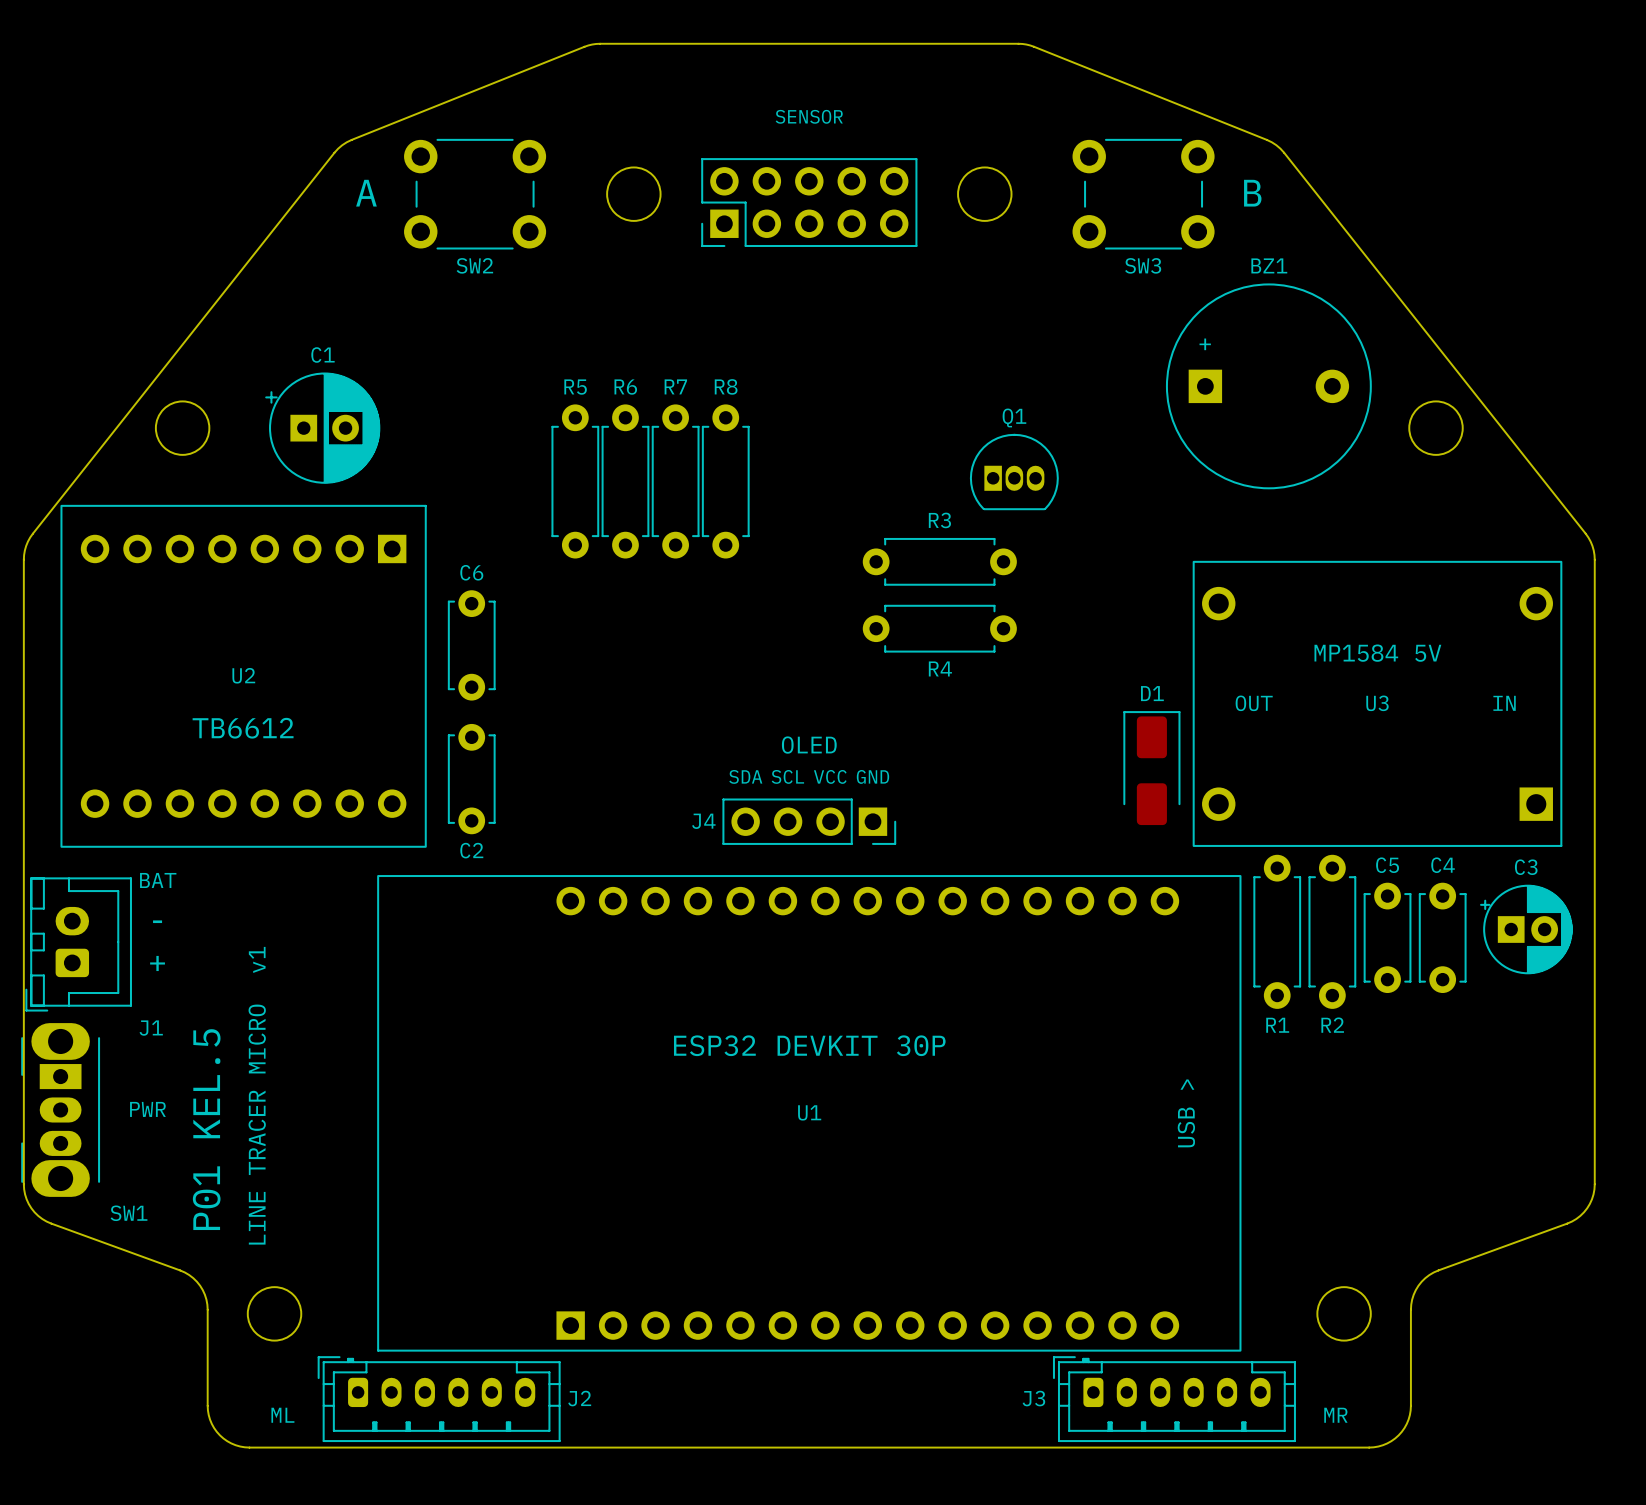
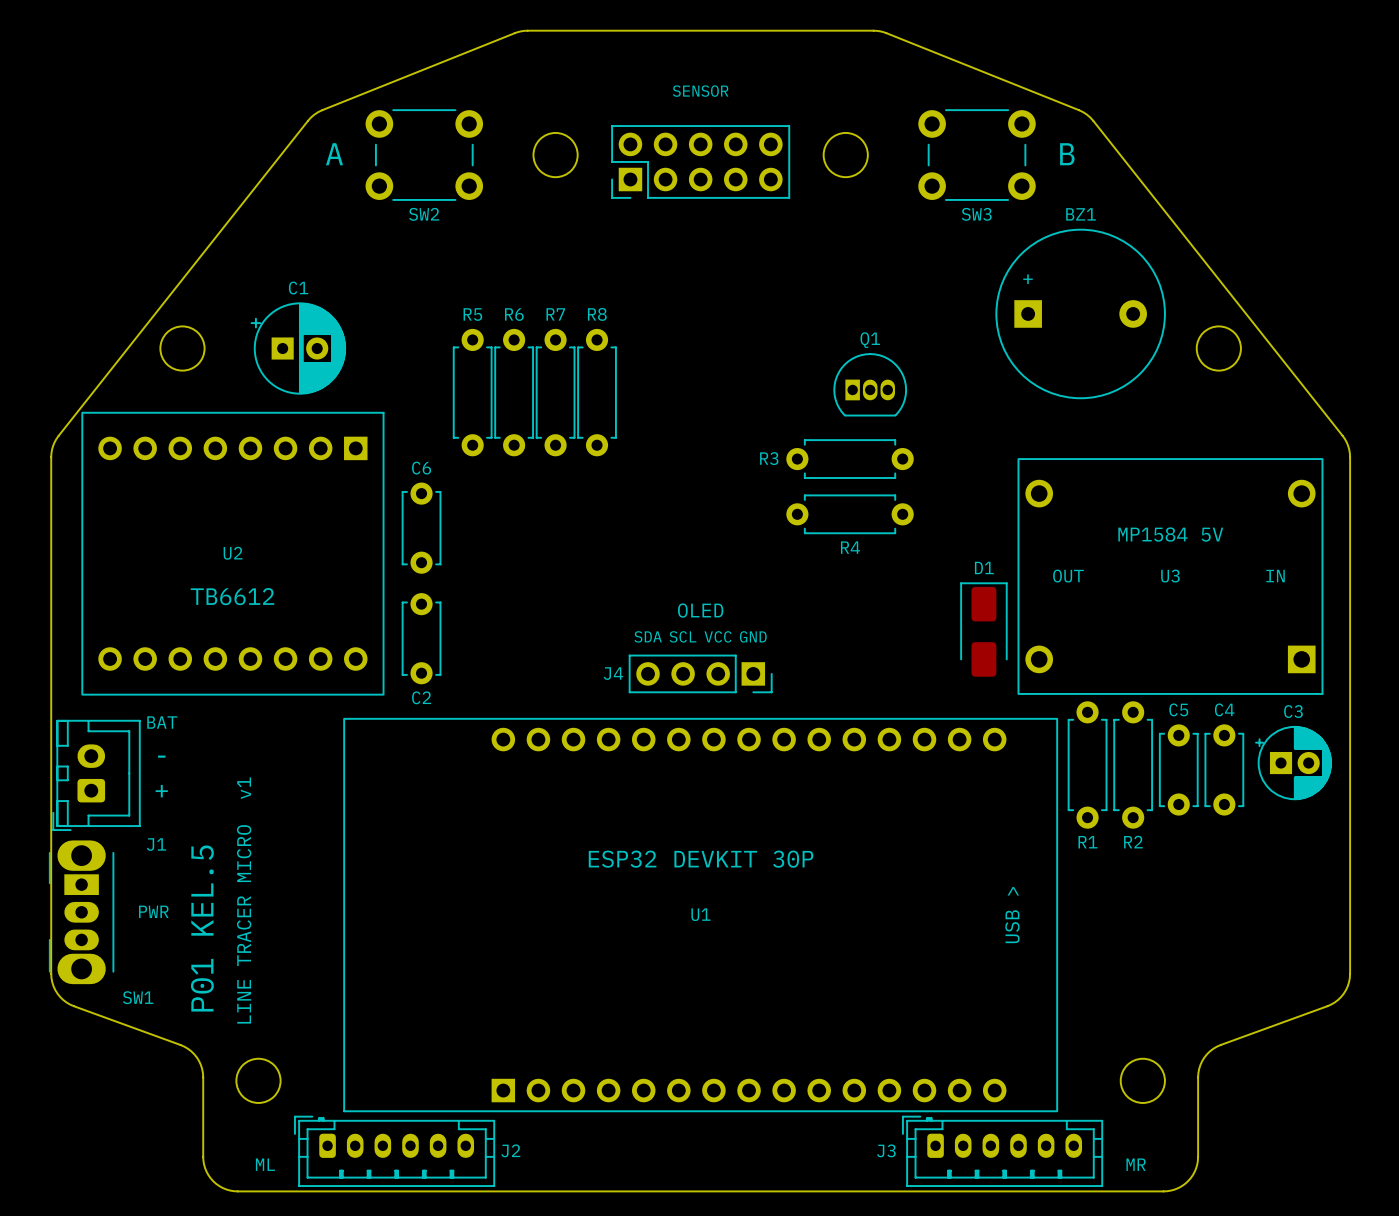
R5 position: (575, 481) -> (472, 392)
R6 position: (625, 481) -> (514, 392)
R7 position: (675, 481) -> (555, 392)
R8 position: (725, 481) -> (597, 392)
R3 name position: R3 (939, 520) -> R3 (769, 458)
R3 position: (939, 561) -> (850, 459)
R4 position: (939, 628) -> (850, 514)

